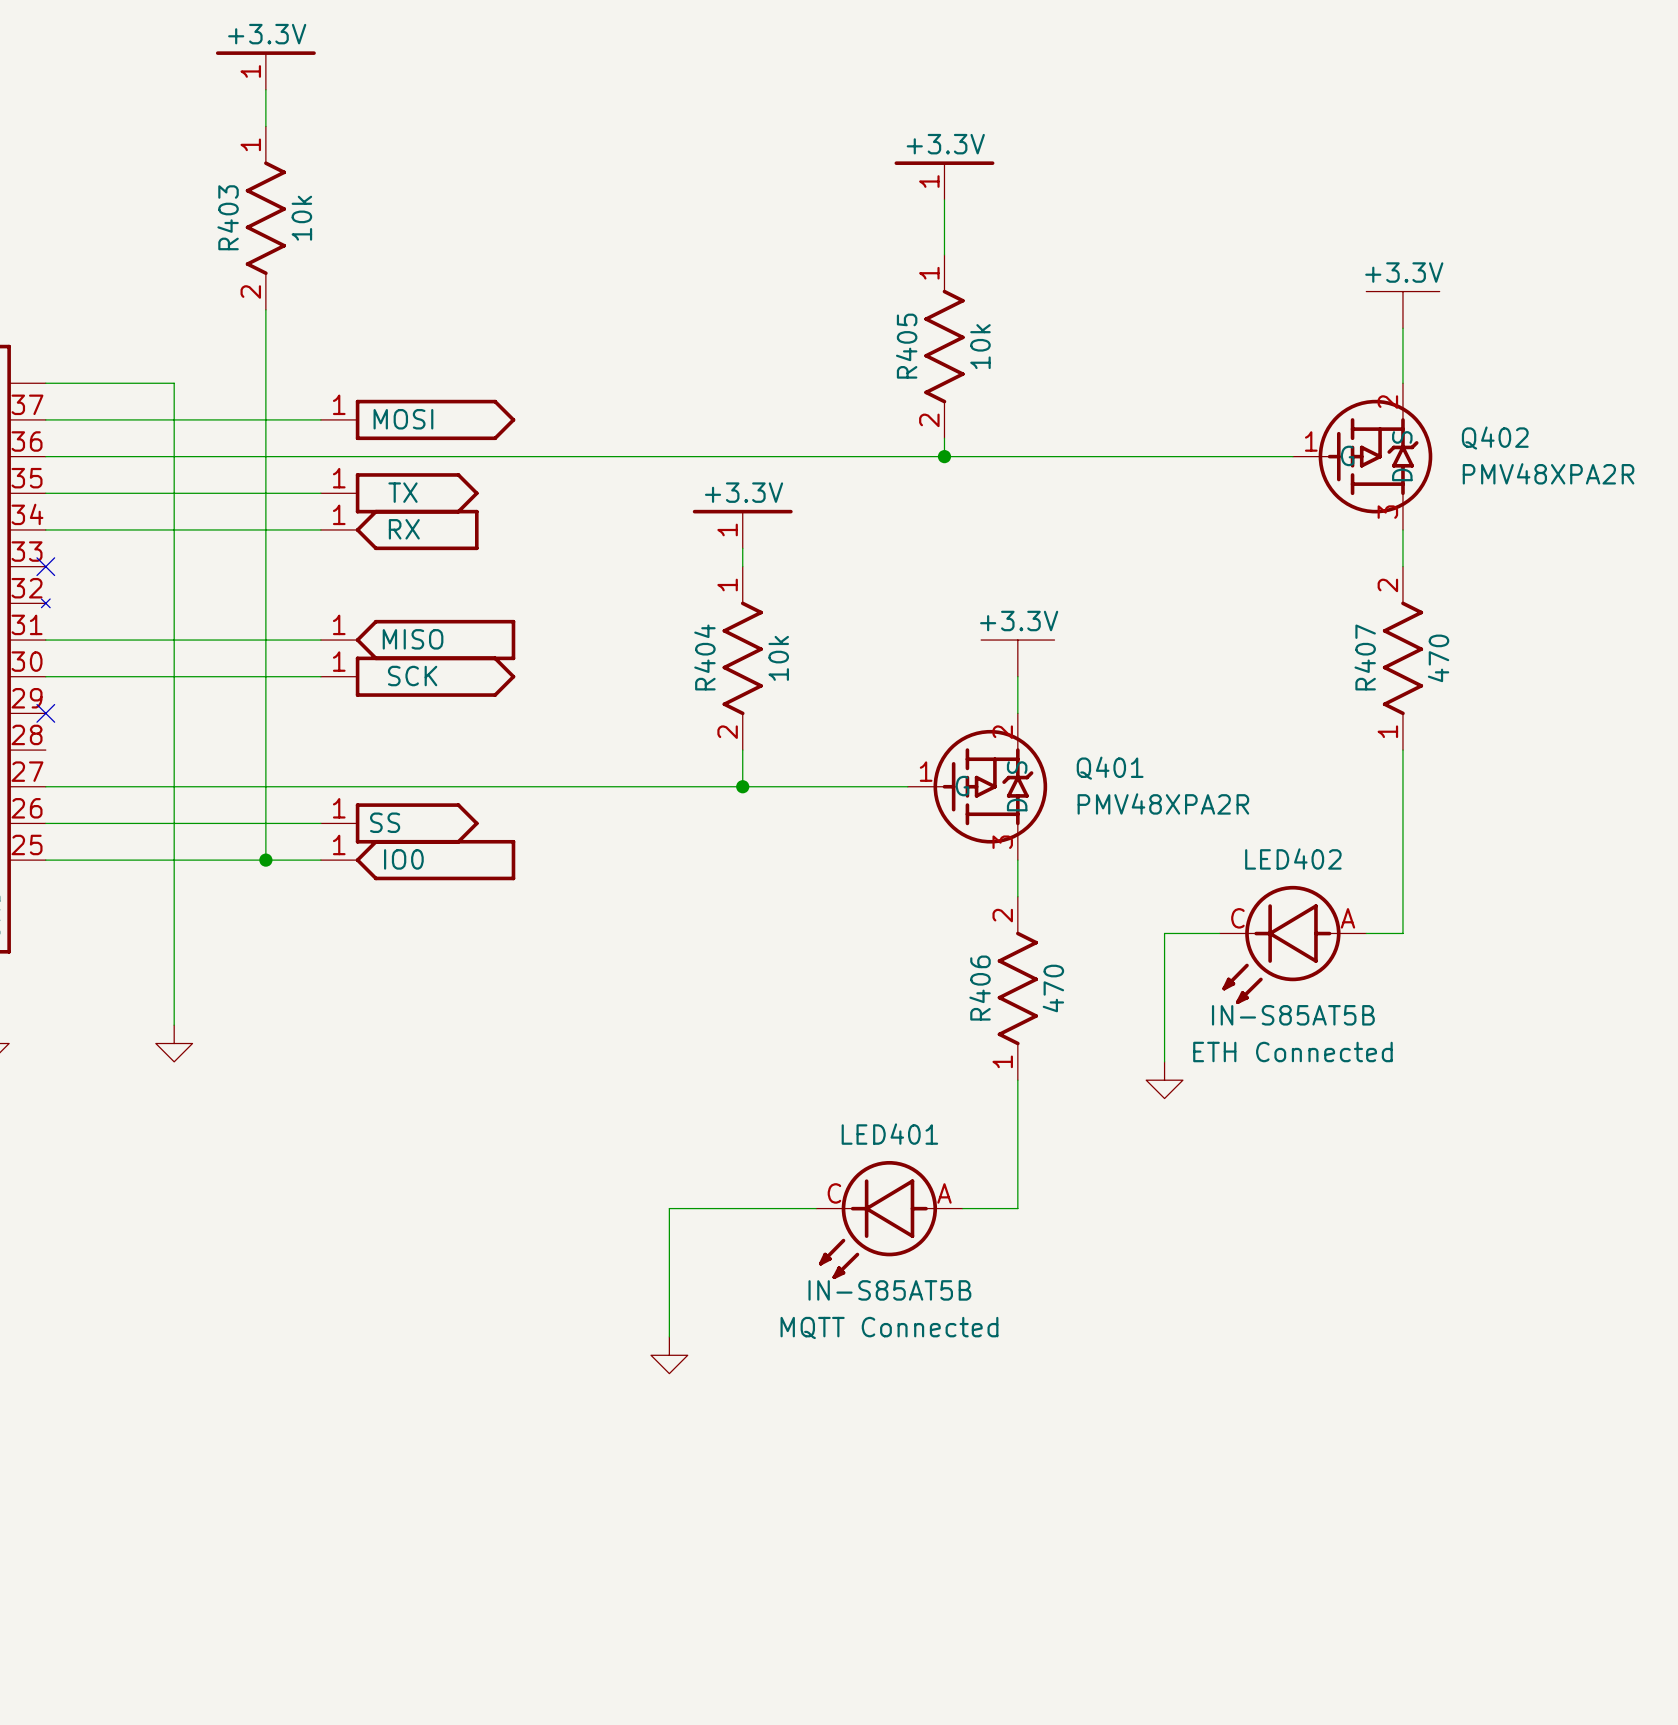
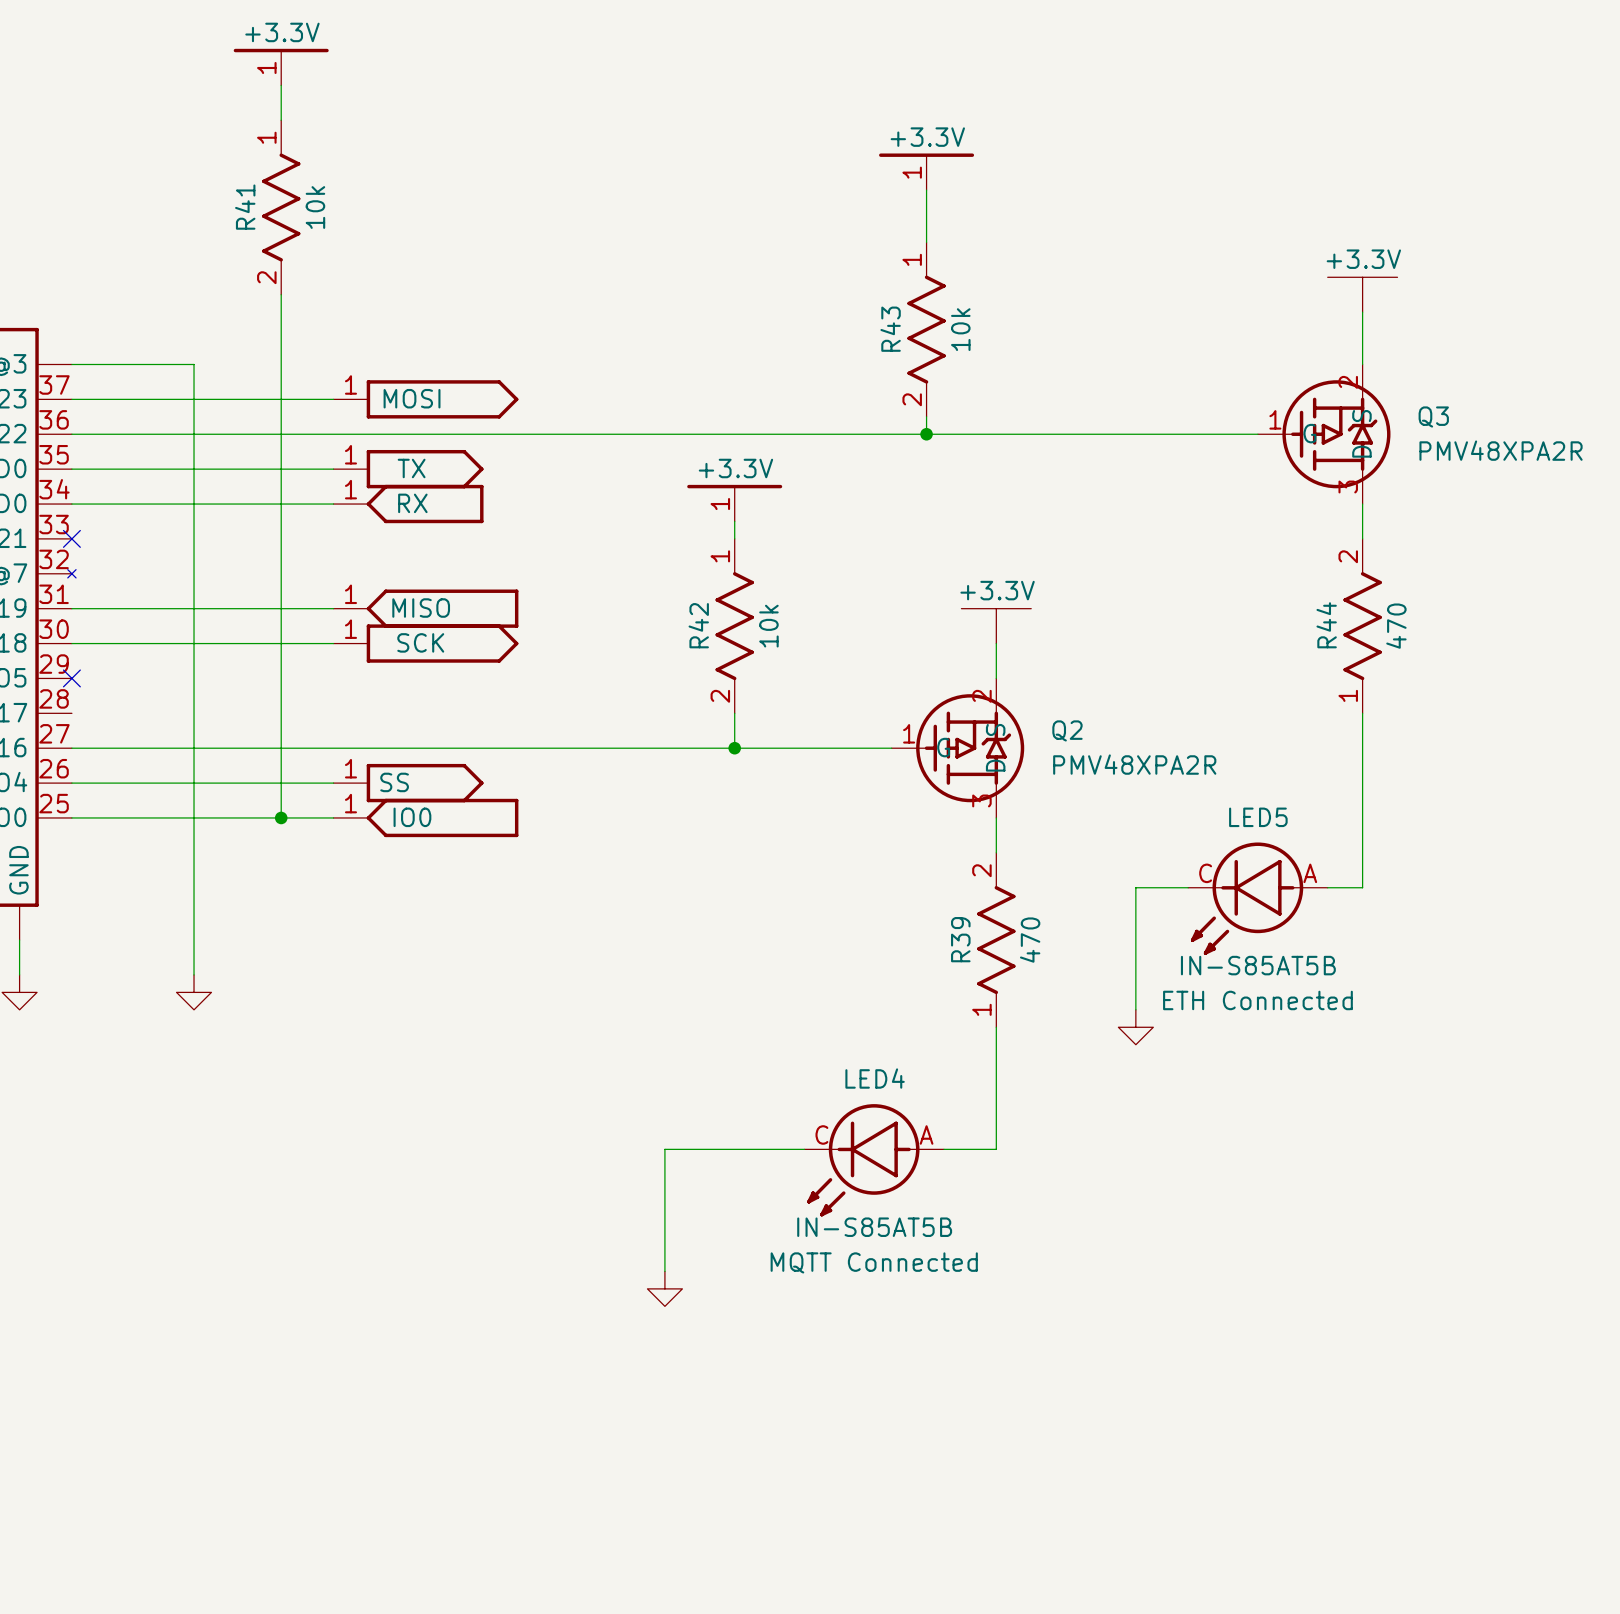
R403 name: R403 (228, 217) -> R41 (245, 207)
R405 name: R405 (906, 346) -> R43 (890, 329)
Q402 name: Q402 (1495, 438) -> Q3 (1433, 416)
R404 name: R404 (704, 657) -> R42 (698, 625)
R407 name: R407 (1365, 657) -> R44 (1326, 625)
Q401 name: Q401 (1110, 768) -> Q2 (1067, 730)
LED402 name: LED402 (1293, 858) -> LED5 (1258, 817)
R406 name: R406 (980, 988) -> R39 (960, 939)
LED401 name: LED401 (889, 1134) -> LED4 (875, 1078)

